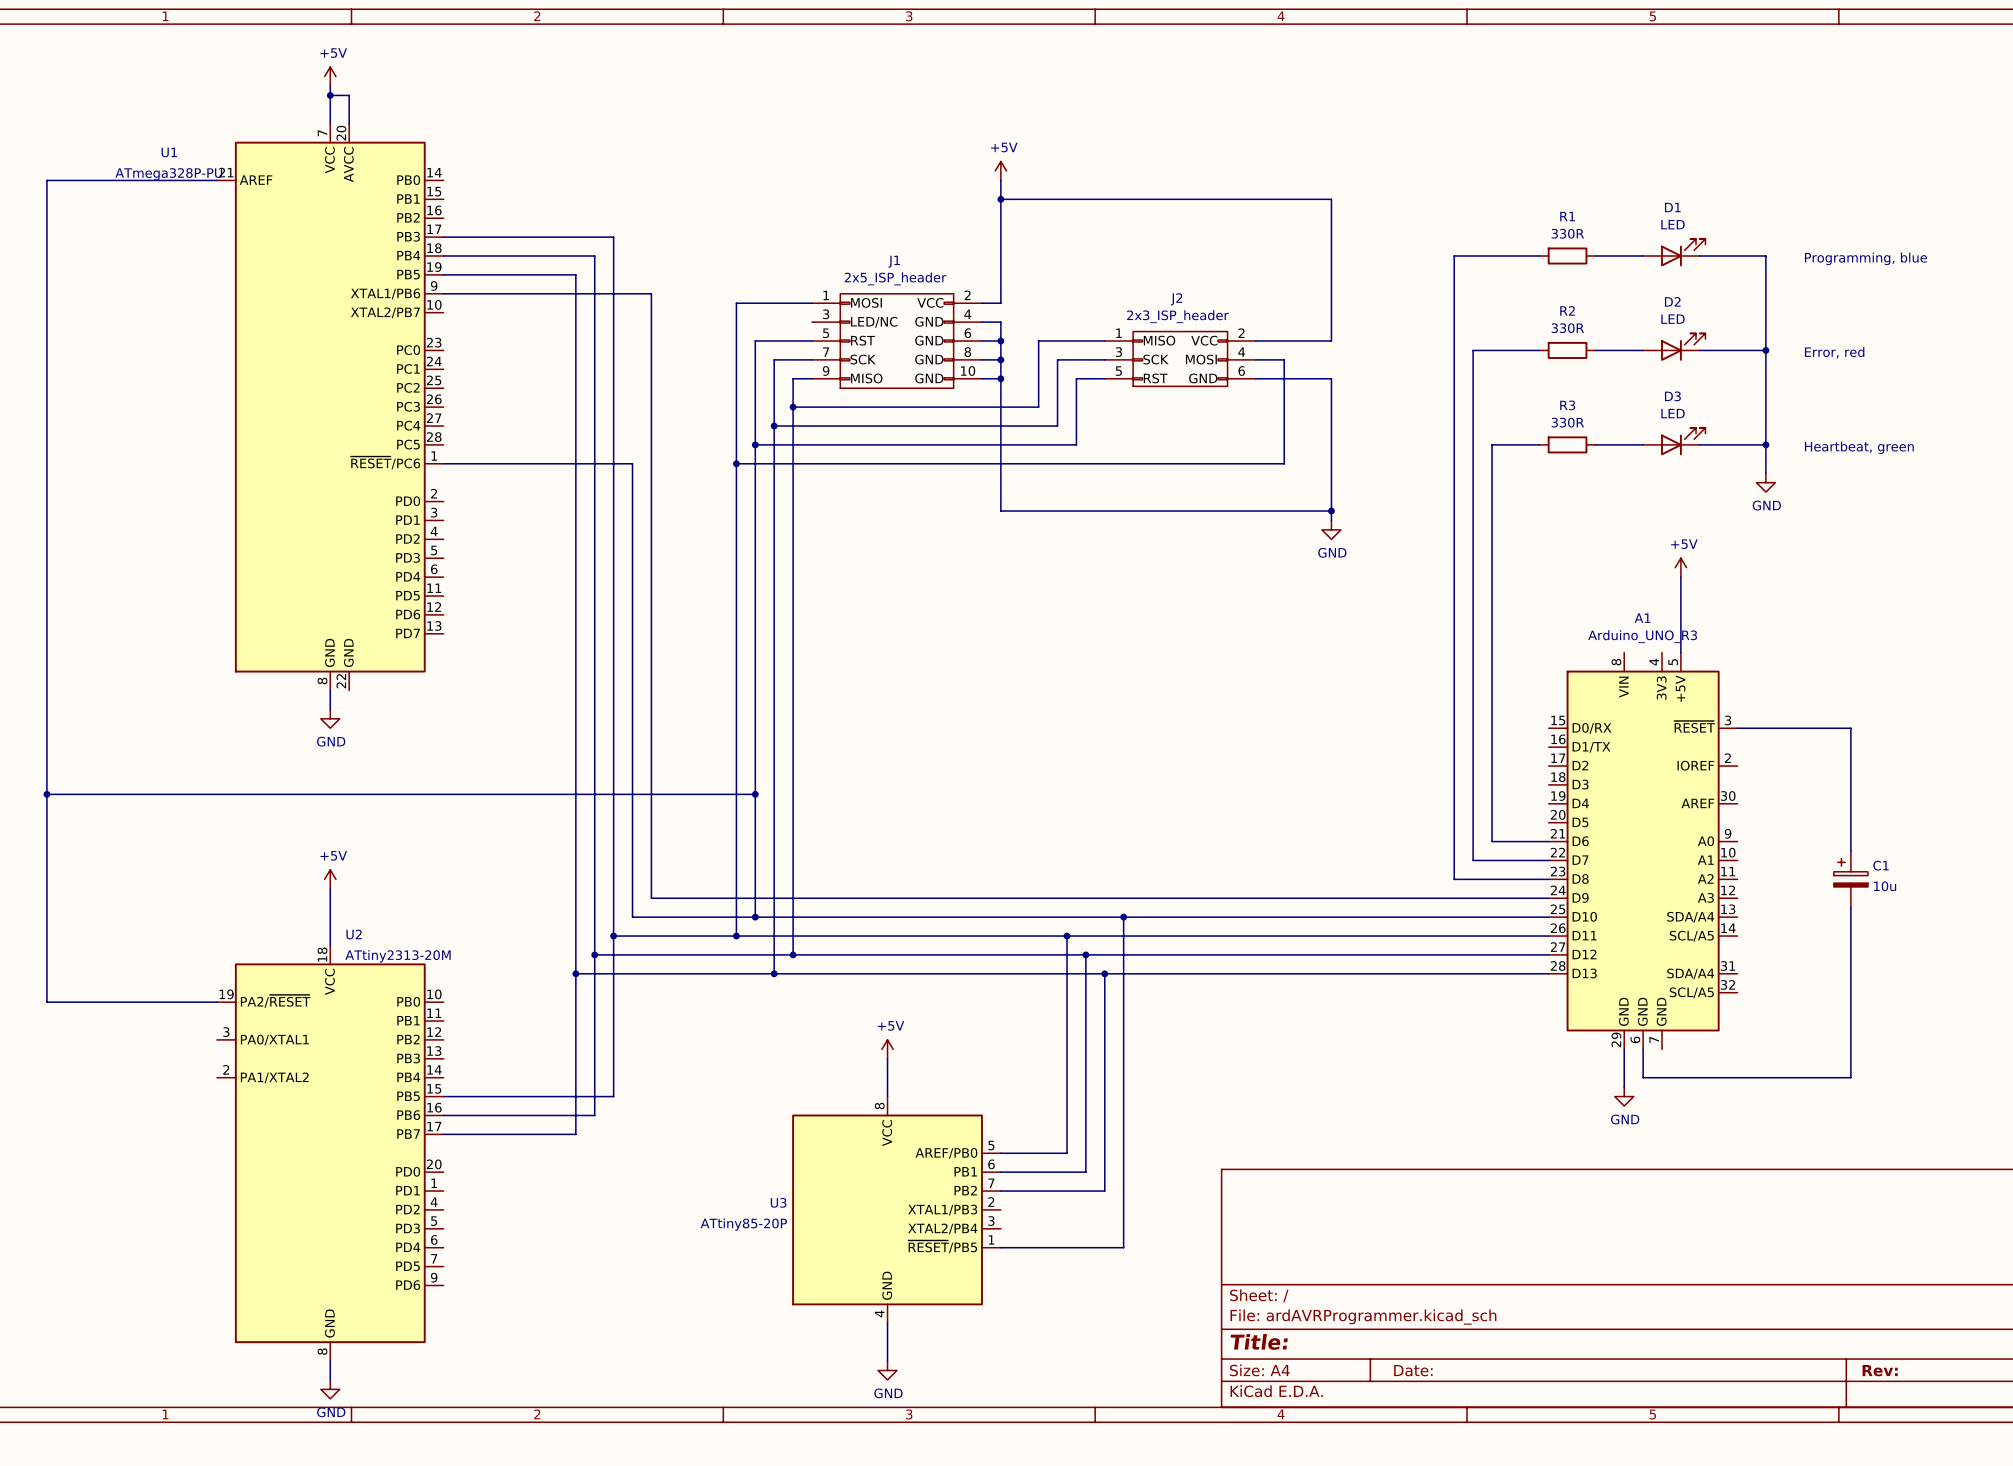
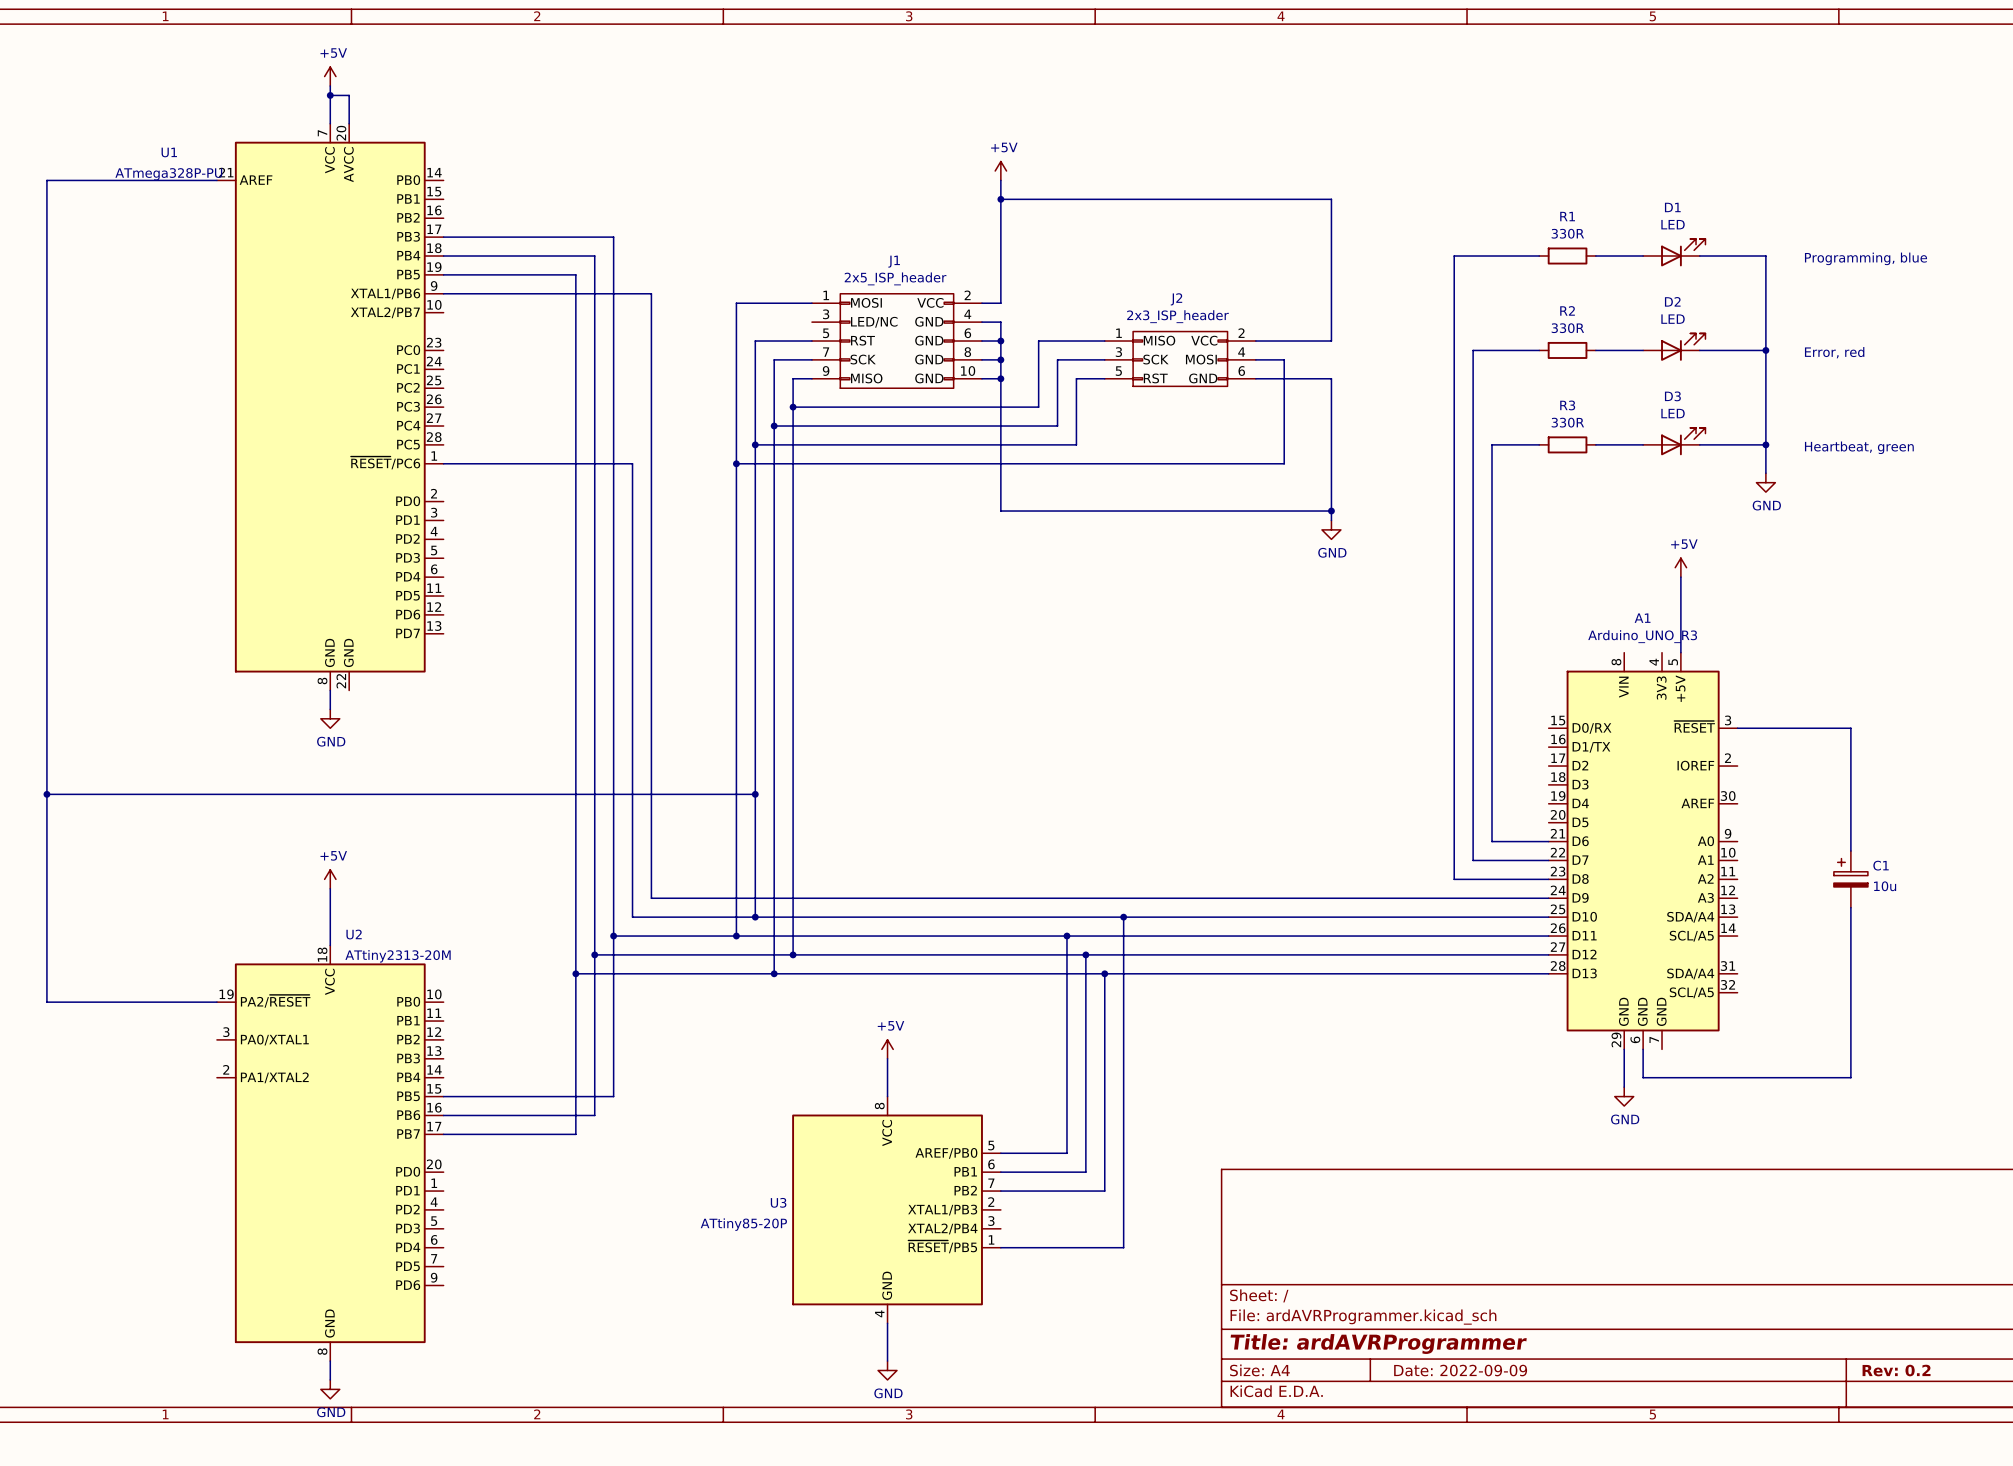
title block: Title: (1259, 1341) -> Title: ardAVRProgrammer (1378, 1344)
title block: Date: (1413, 1370) -> Date: 2022-09-09 (1460, 1370)
title block: Rev: (1880, 1370) -> Rev: 0.2 (1896, 1370)

